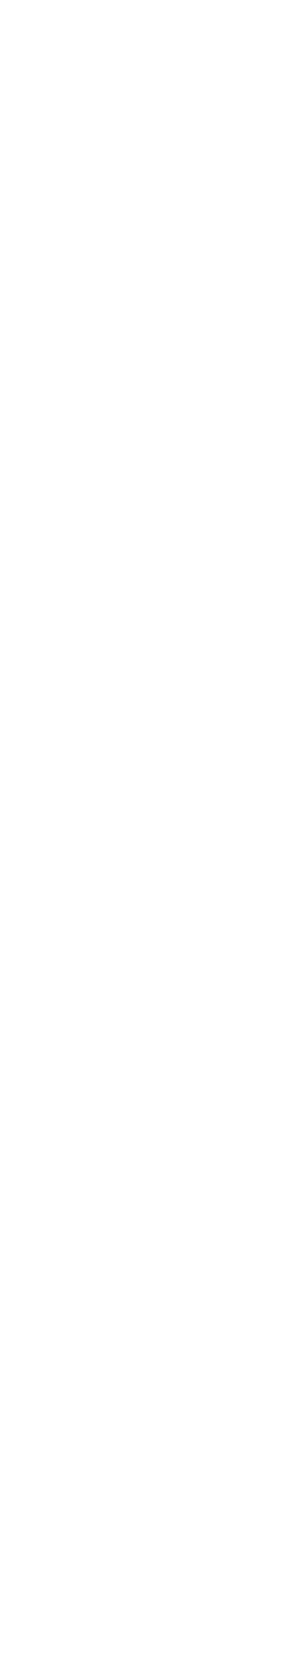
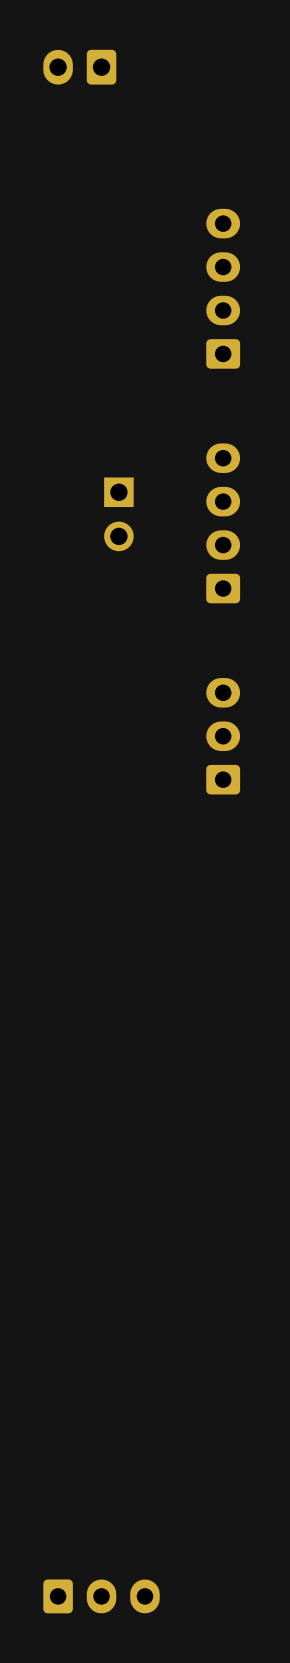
part: none -> (79, 67)
part: none -> (223, 288)
part: none -> (118, 514)
part: none -> (223, 523)
part: none -> (223, 736)
part: none -> (101, 1596)

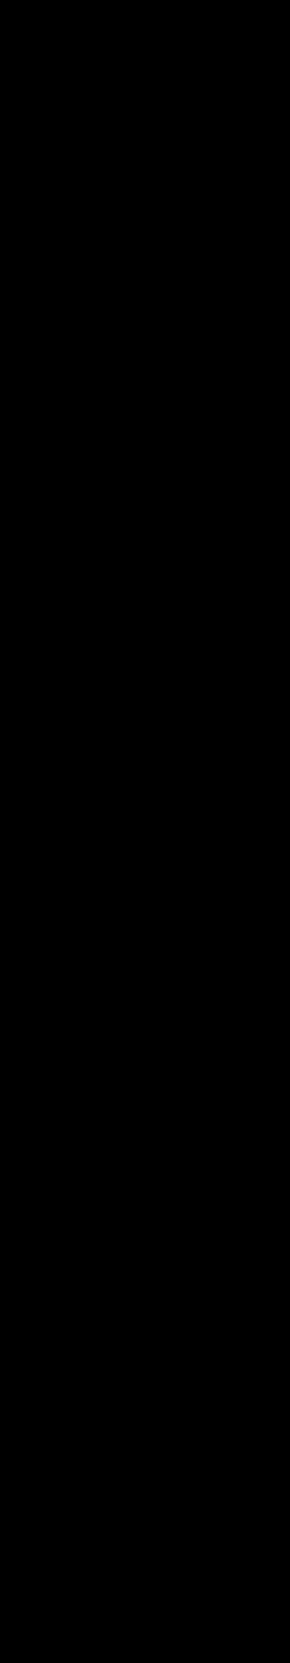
part: (79, 67) -> none
part: (223, 288) -> none
part: (118, 514) -> none
part: (223, 523) -> none
part: (223, 736) -> none
part: (101, 1596) -> none

